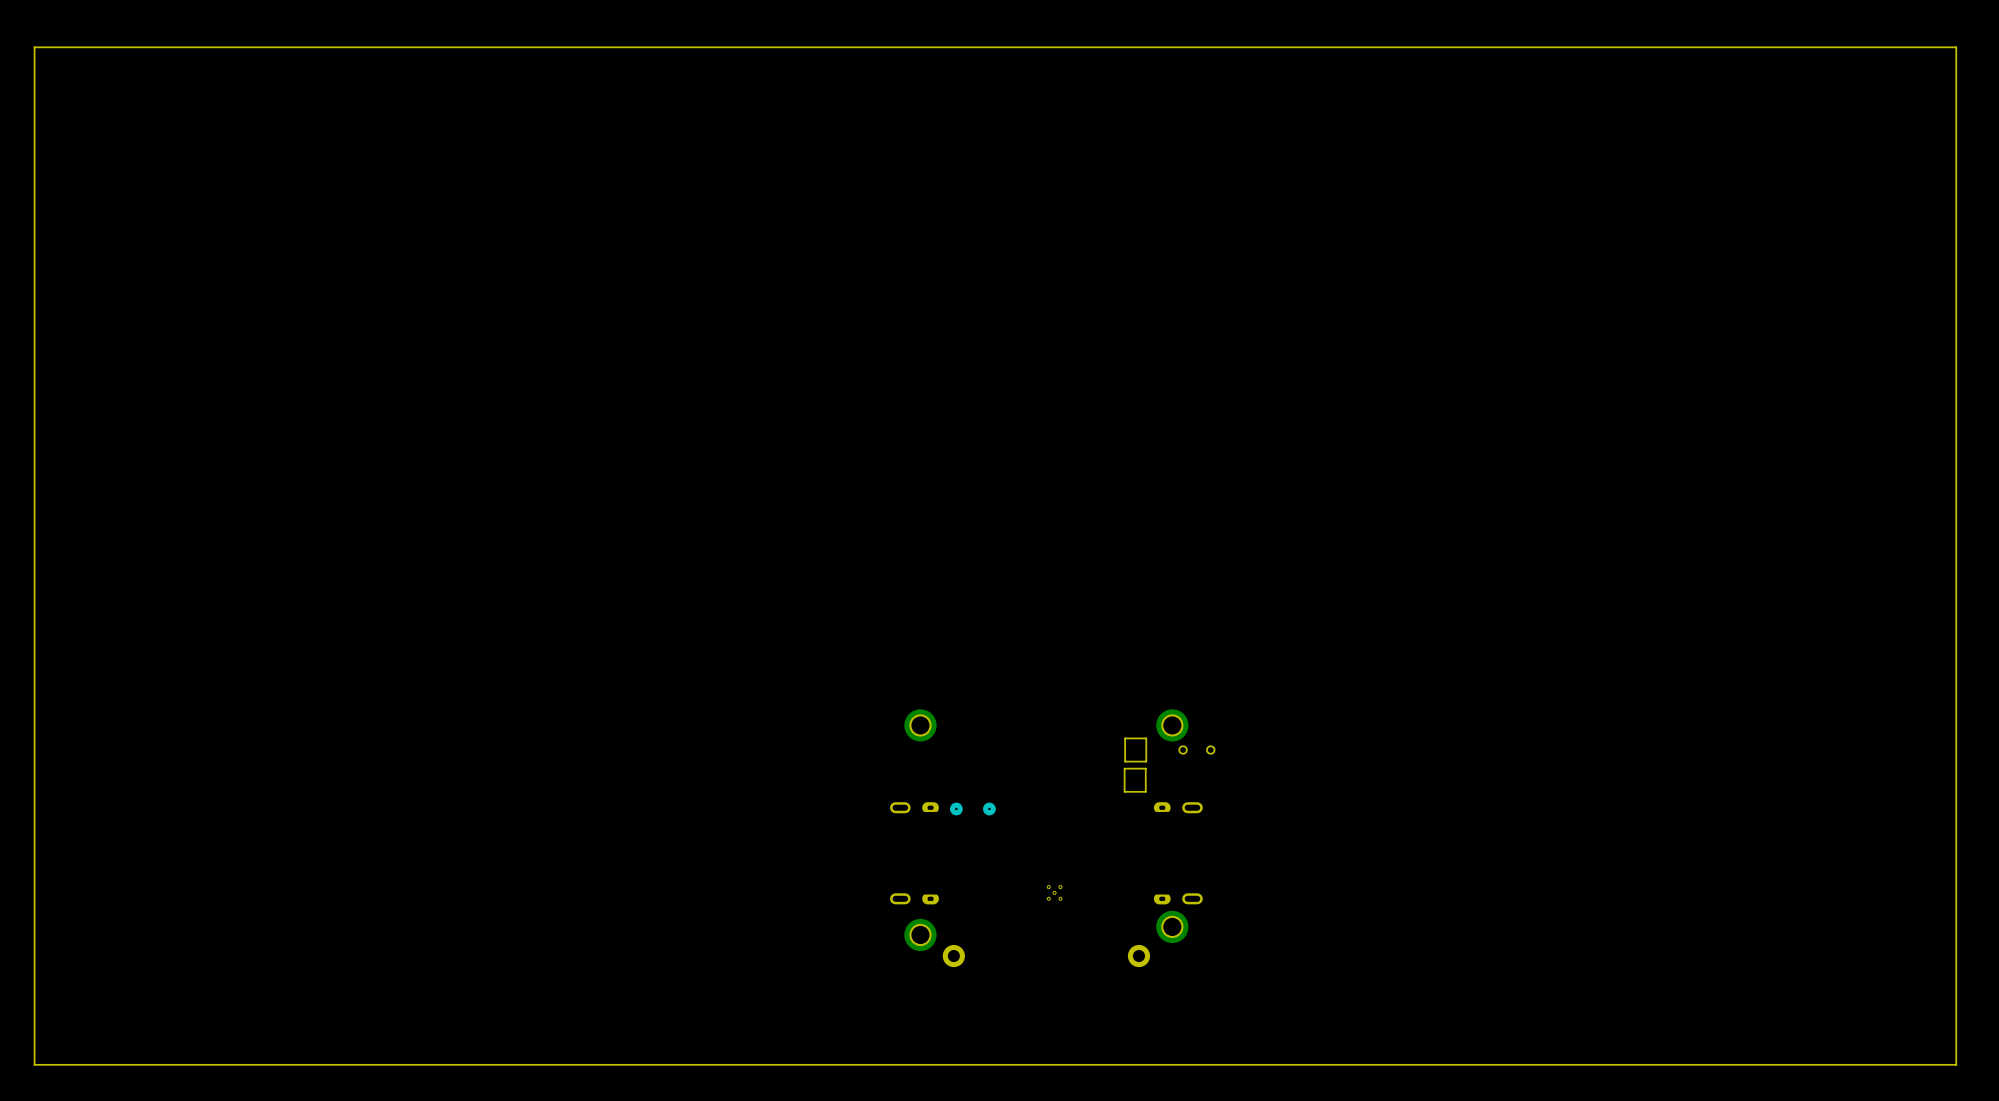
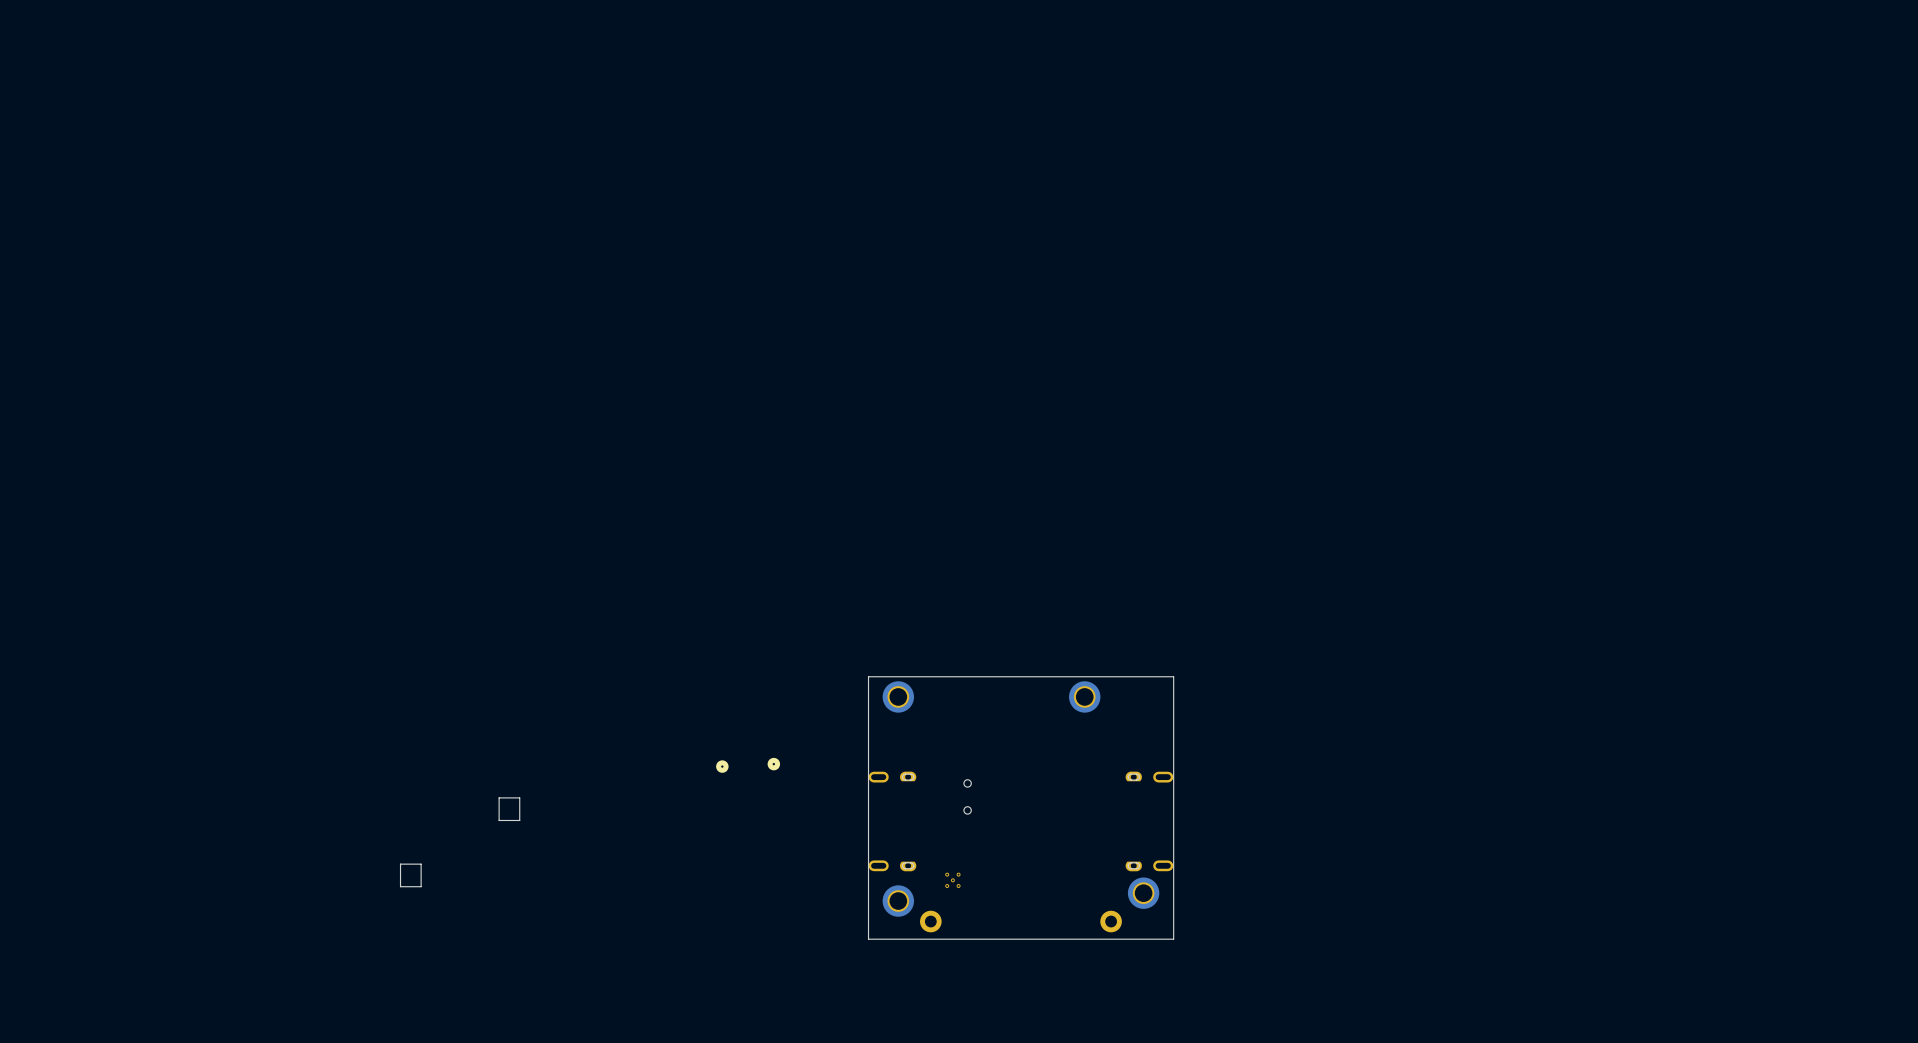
board edge: (1956, 47) (34, 47) (34, 1064) (1956, 1064) (1956, 47) -> none
board edge: none -> (1173, 676) (868, 676) (868, 939) (1173, 939) (1173, 676)
part position: (1172, 725) -> (1084, 696)
part: (1135, 750) -> none
part rotation: 0° (1196, 750) -> 90° clockwise (967, 796)
part position: (1196, 750) -> (967, 796)
part: (1135, 780) -> none
part: none -> (773, 764)
part: none -> (722, 766)
part: (956, 809) -> none
part: (989, 809) -> none
part: none -> (509, 809)
part position: (1054, 892) -> (952, 880)
part: none -> (410, 875)

